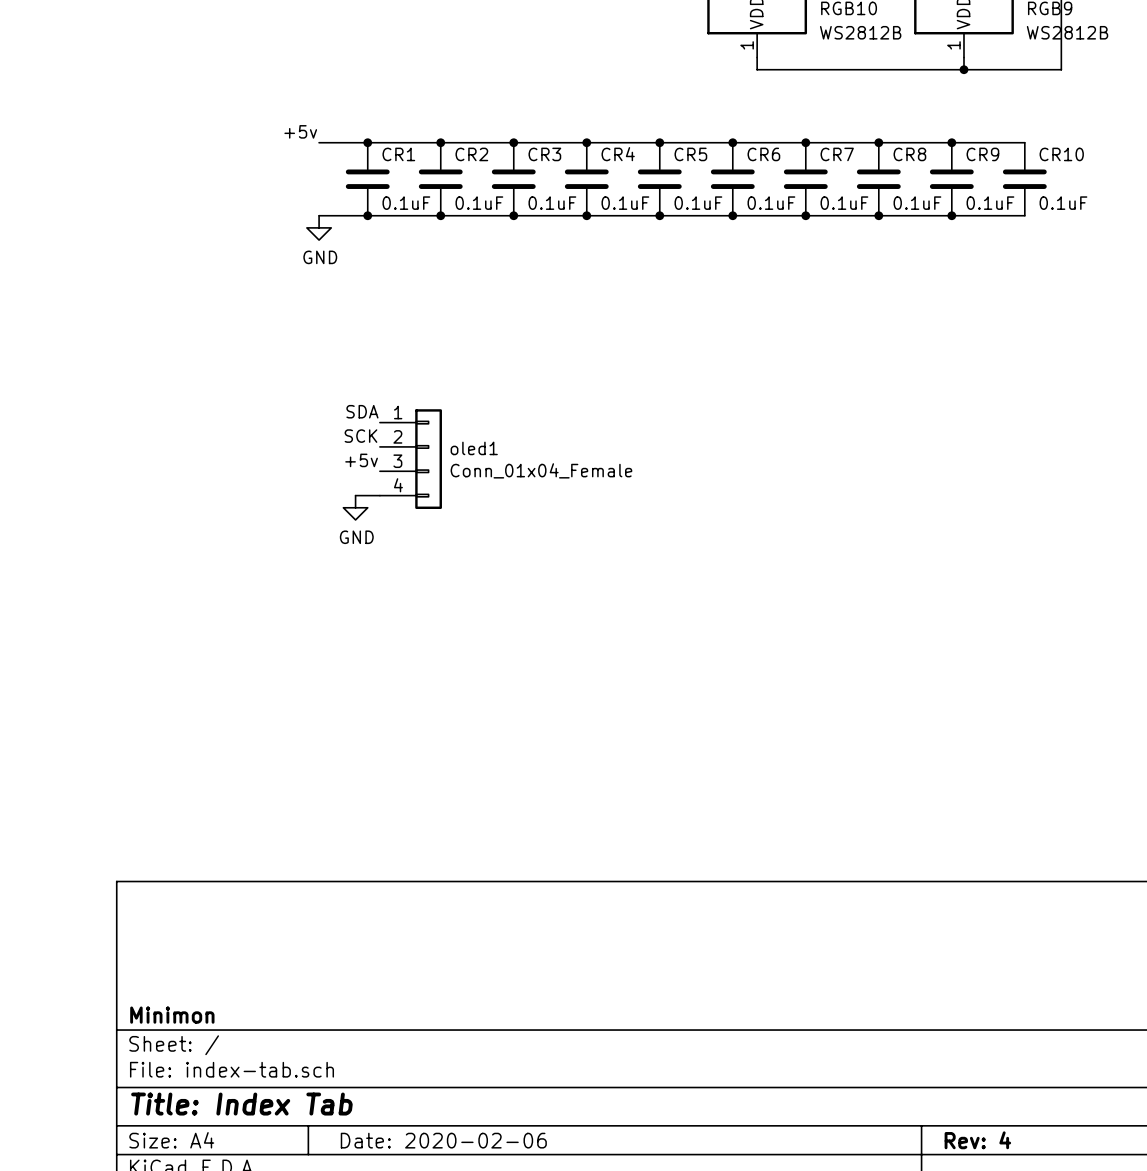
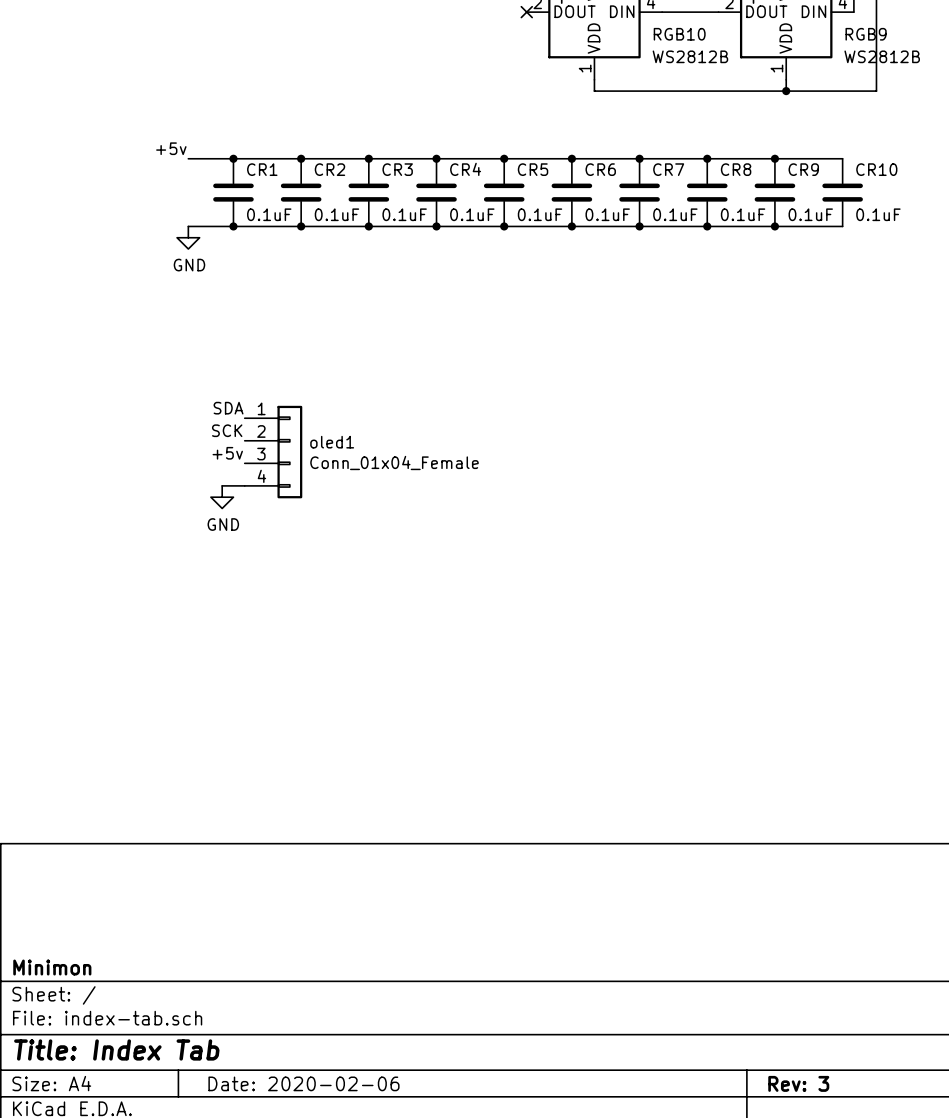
title block: Rev: 4 (977, 1140) -> Rev: 3 (798, 1083)

